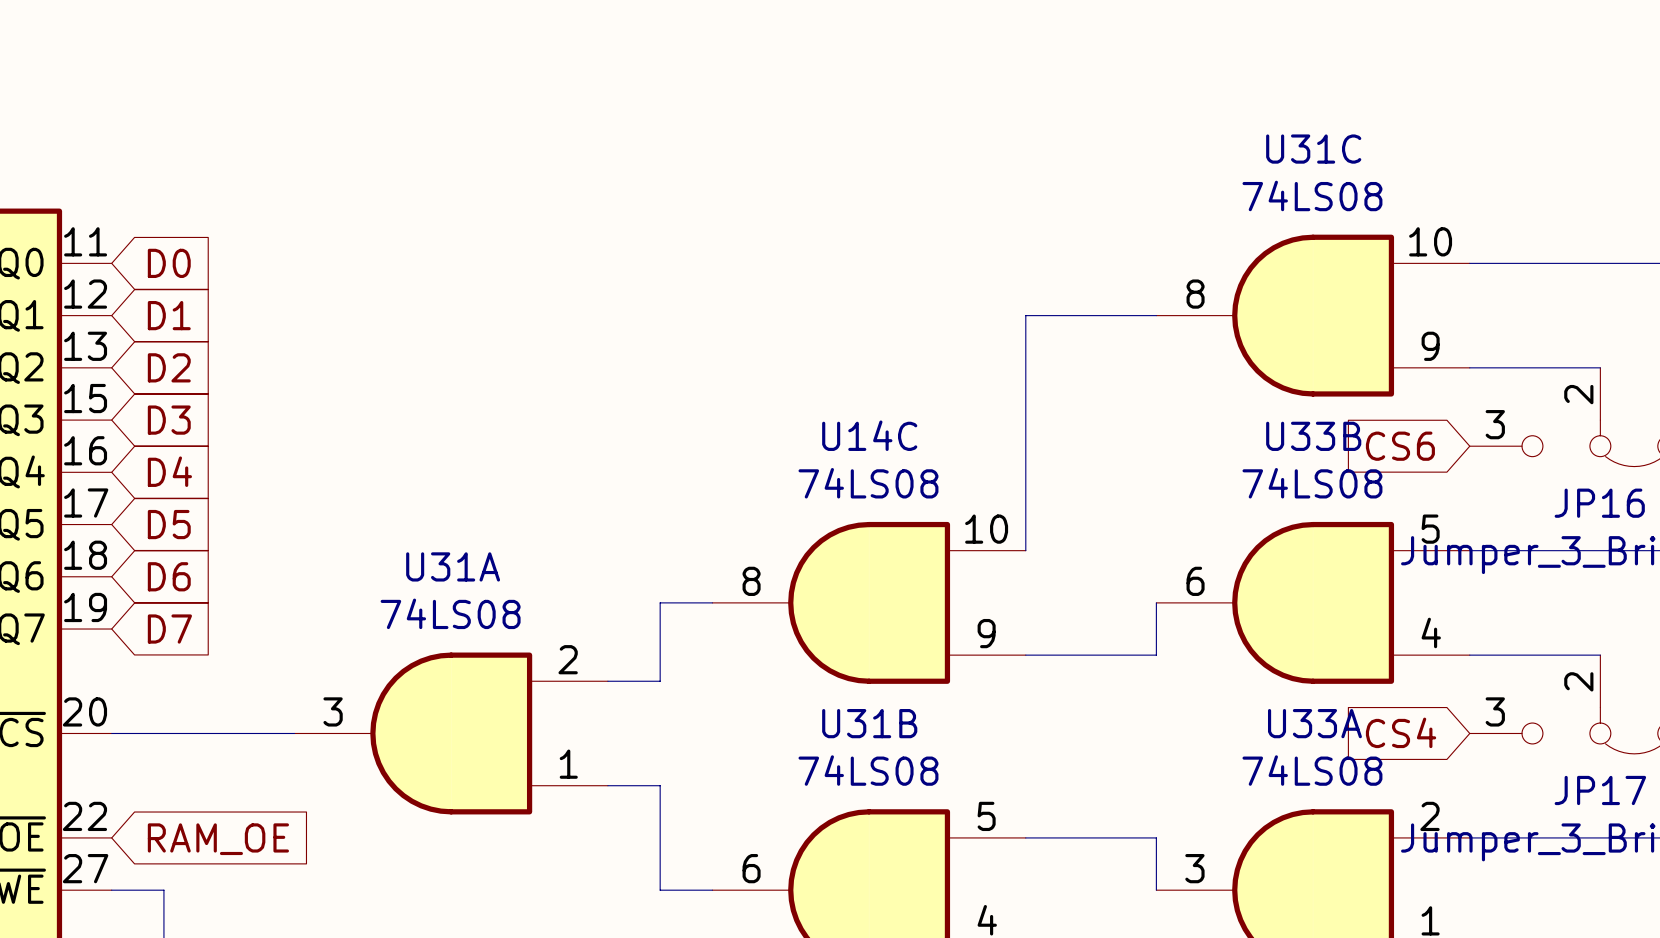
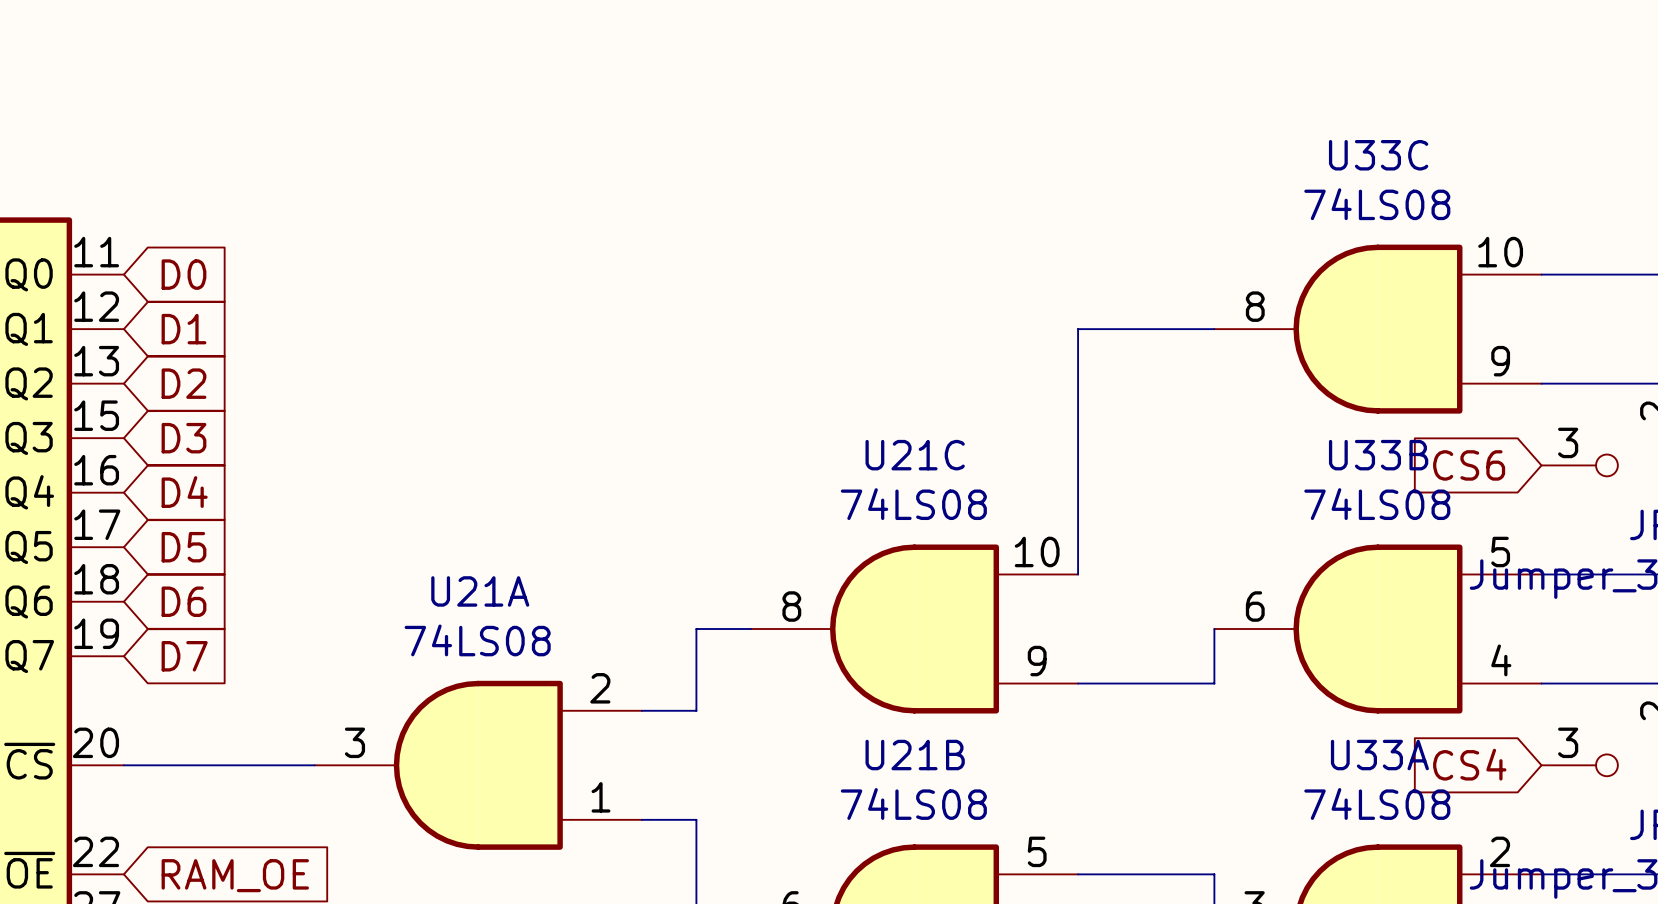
U31C name: U31C (1313, 149) -> U33C (1378, 155)
U14C name: U14C (869, 435) -> U21C (915, 455)
U31A name: U31A (453, 566) -> U21A (480, 591)
U31B name: U31B (869, 723) -> U21B (915, 755)

